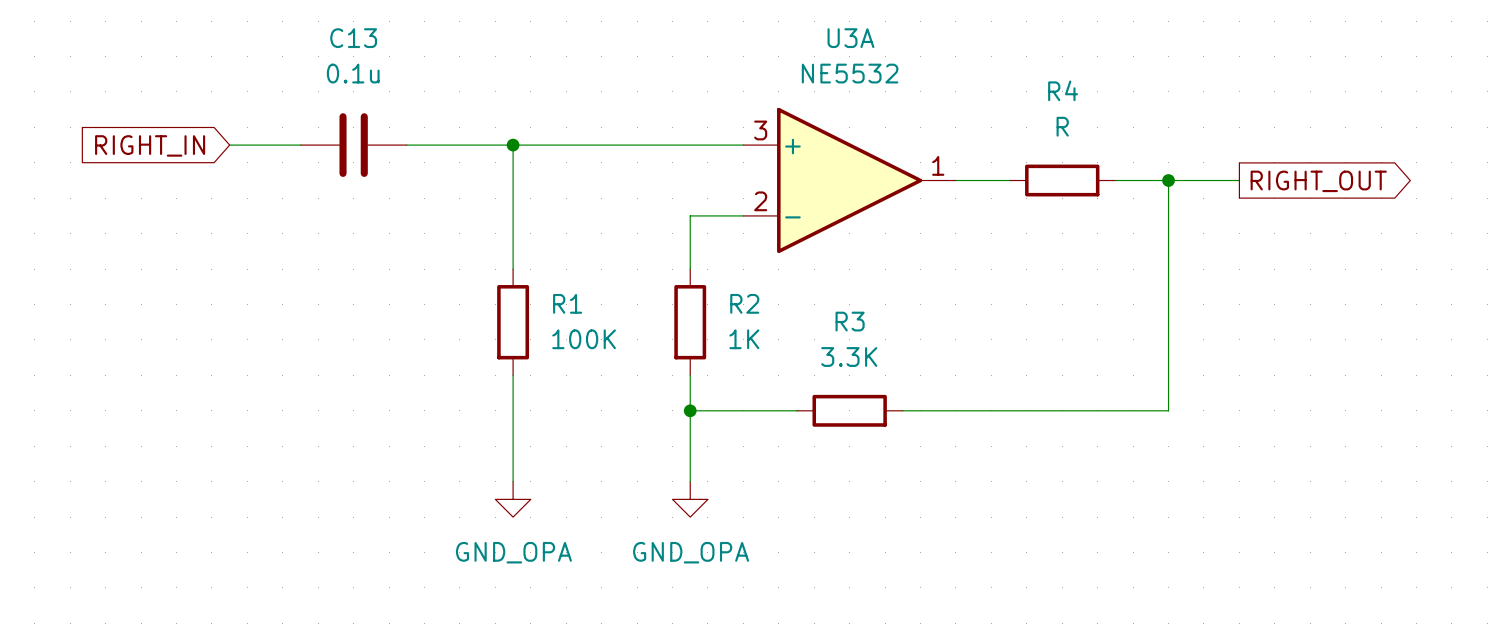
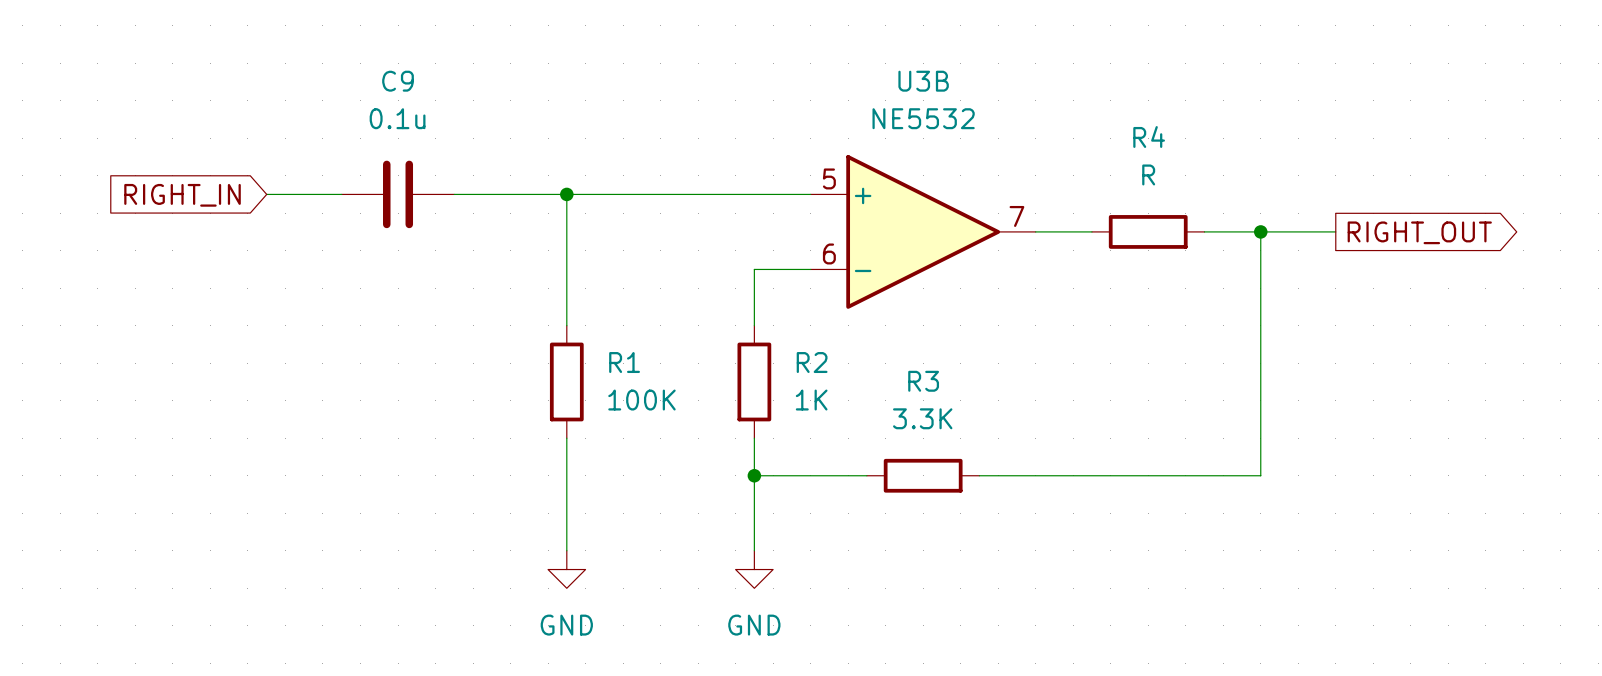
C13 name: C13 (353, 38) -> C9 (398, 81)
U3A name: U3A (850, 38) -> U3B (923, 81)
U3A pin number: 3 (760, 130) -> 5 (829, 178)
U3A pin number: 1 (938, 165) -> 7 (1016, 216)
U3A pin number: 2 (760, 201) -> 6 (829, 253)
power symbol: GND_OPA (513, 499) -> GND (566, 569)
power symbol: GND_OPA (690, 499) -> GND (754, 569)

